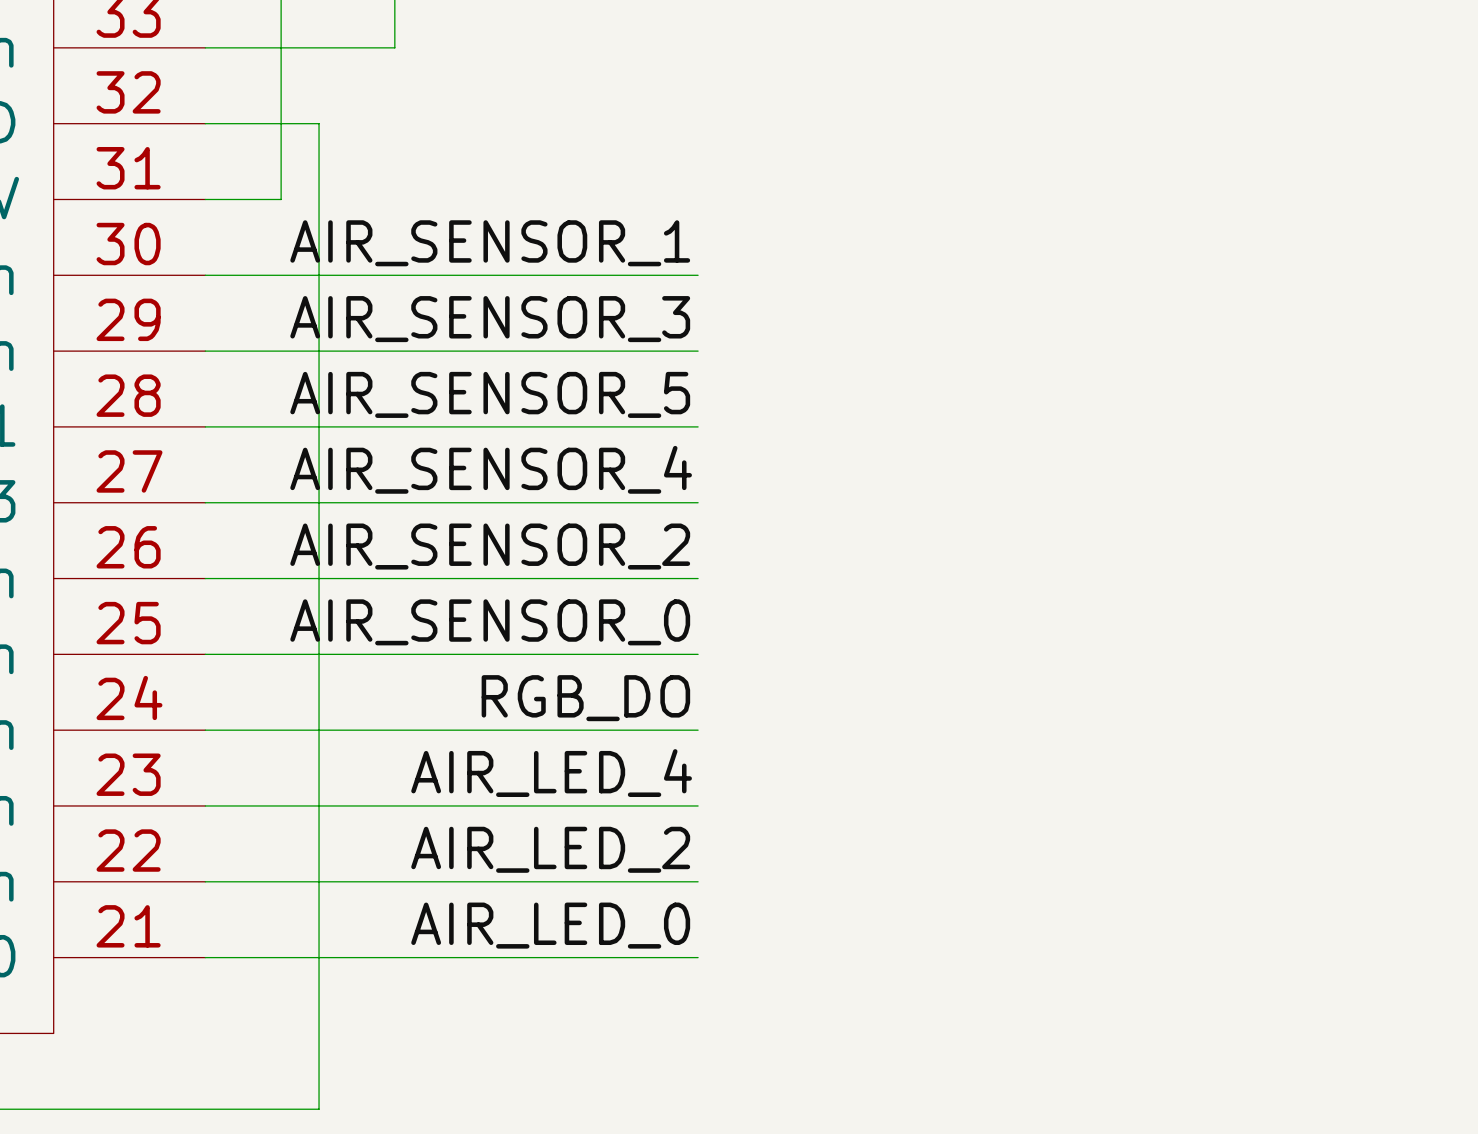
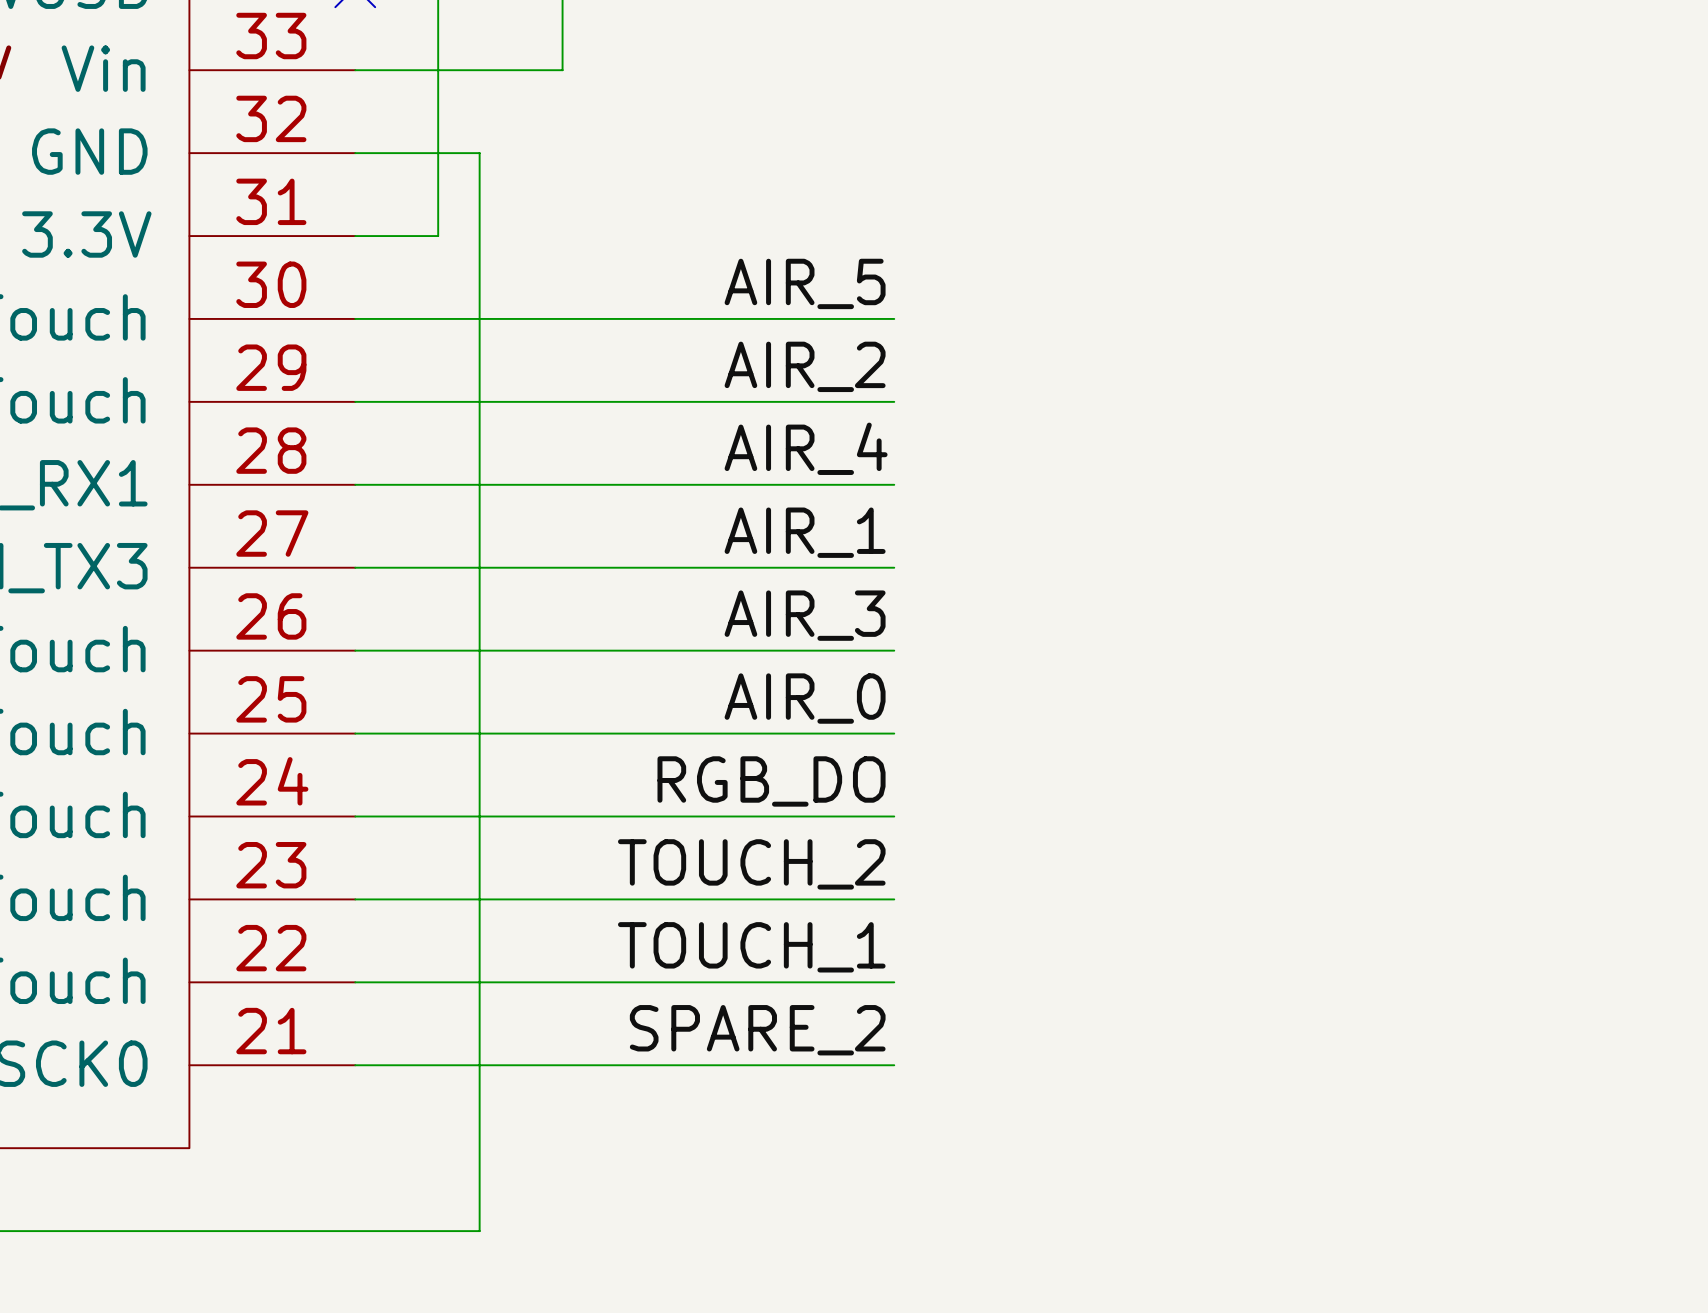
label: AIR_SENSOR_1 (490, 243) -> AIR_5 (805, 283)
label: AIR_SENSOR_3 (490, 319) -> AIR_2 (805, 366)
label: AIR_SENSOR_5 (490, 394) -> AIR_4 (806, 448)
label: AIR_SENSOR_4 (491, 469) -> AIR_1 (805, 532)
label: AIR_SENSOR_2 (490, 546) -> AIR_3 (805, 615)
label: AIR_SENSOR_0 (490, 622) -> AIR_0 (805, 698)
label: AIR_LED_4 (551, 773) -> TOUCH_2 (751, 864)
label: AIR_LED_2 (550, 849) -> TOUCH_1 (751, 947)
label: AIR_LED_0 (550, 925) -> SPARE_2 (757, 1030)

